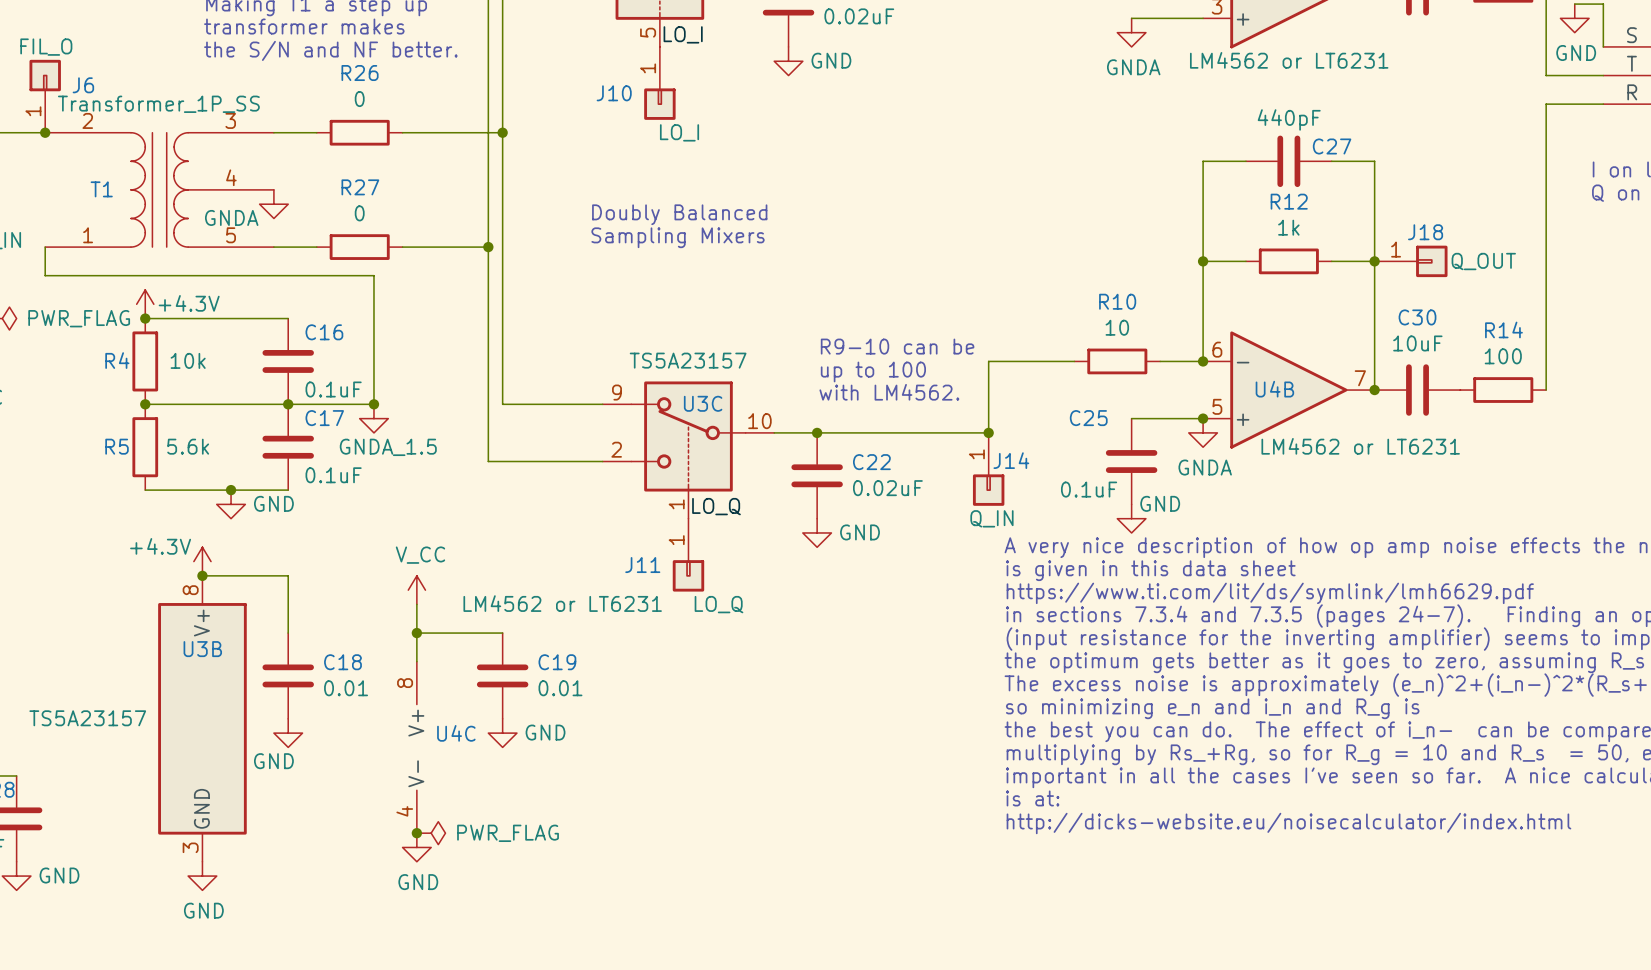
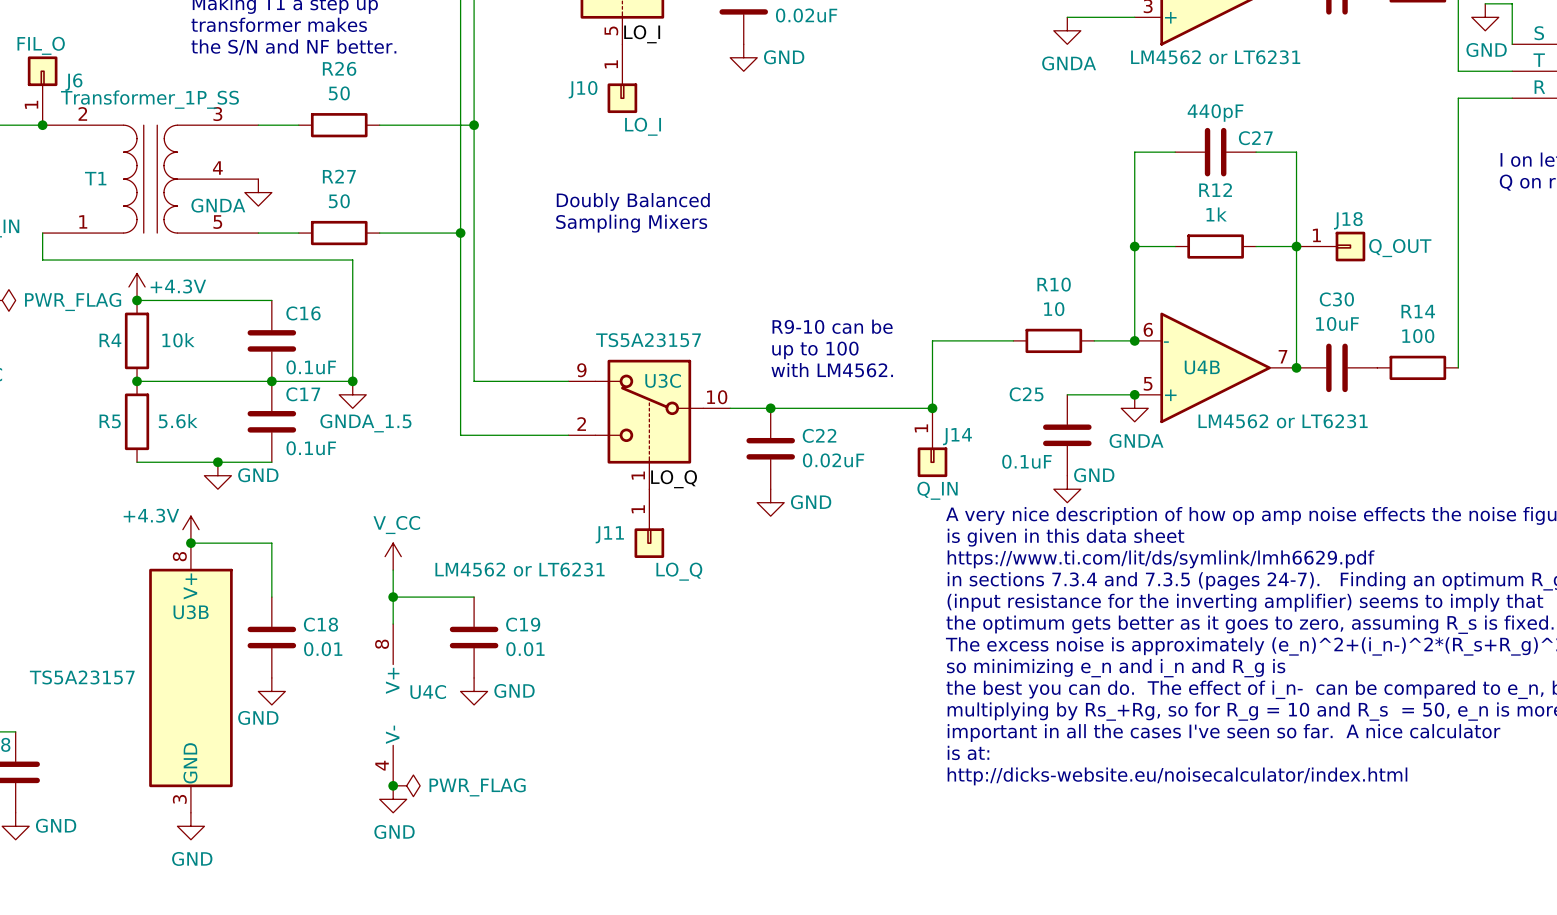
R26 value: 0 (359, 99) -> 50 (339, 93)
R27 value: 0 (359, 213) -> 50 (339, 201)

